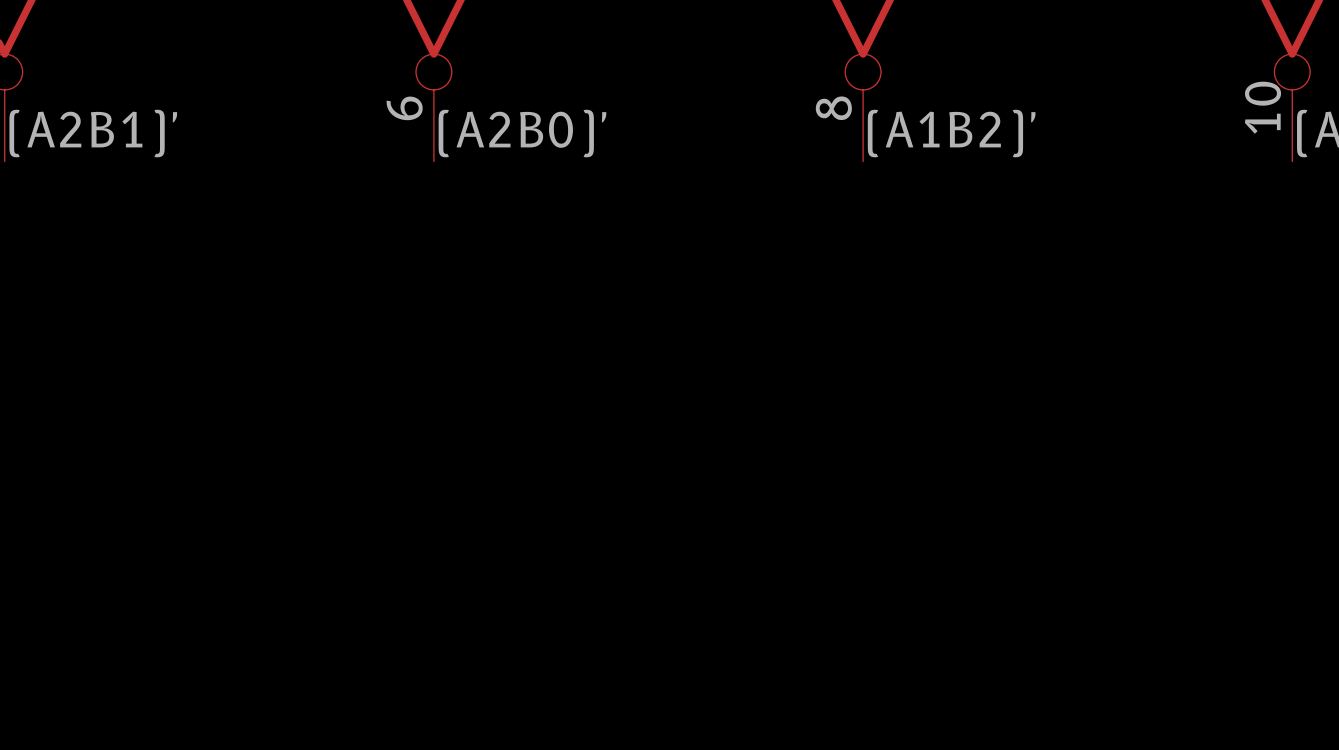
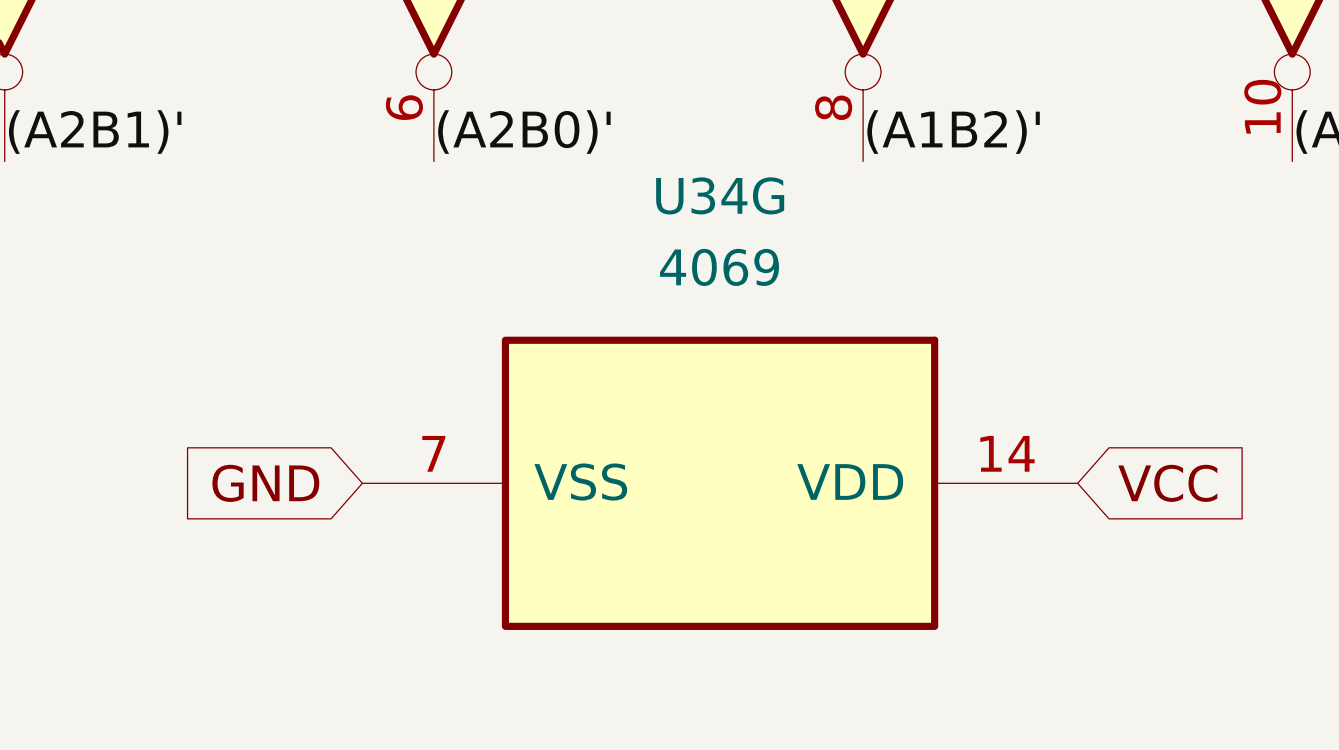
global label: none -> GND (265, 483)
U34G: none -> 4069 (720, 483)
global label: none -> VCC (1167, 483)

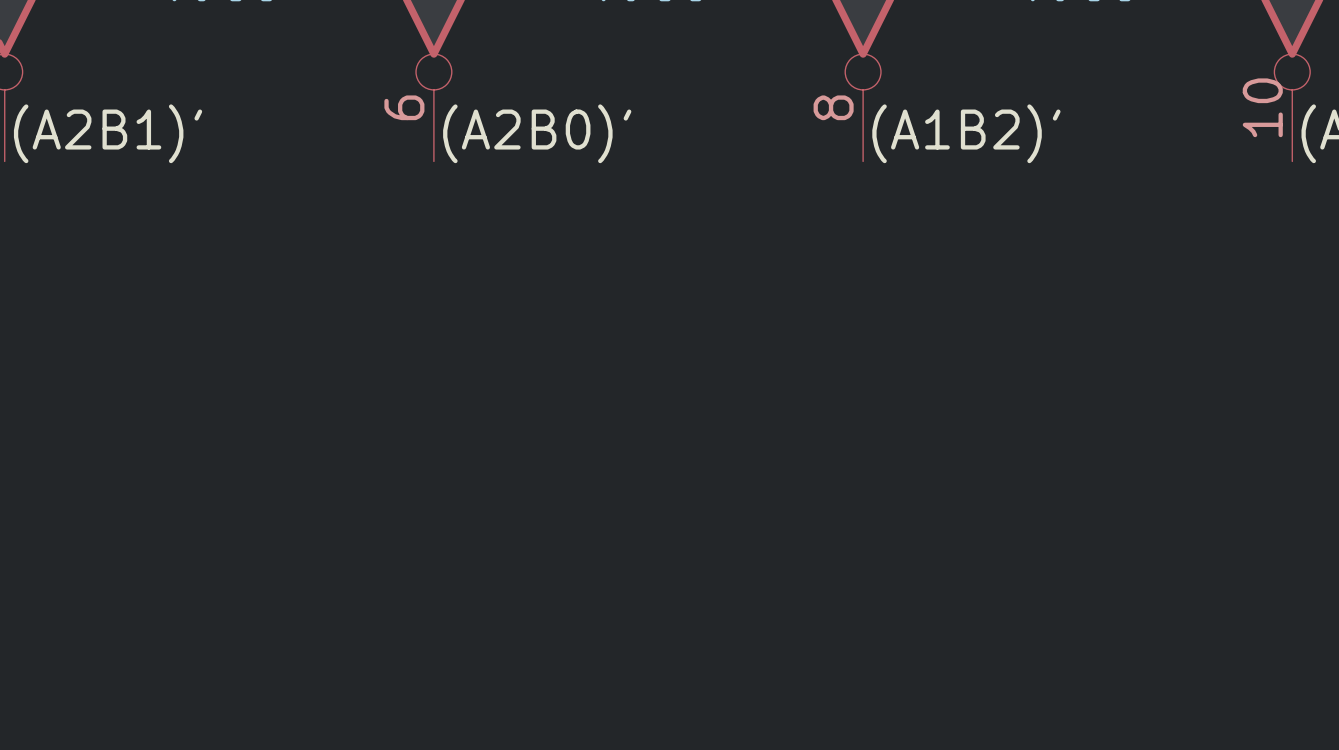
global label: GND (265, 483) -> none
U34G: 4069 (720, 483) -> none
global label: VCC (1167, 483) -> none

